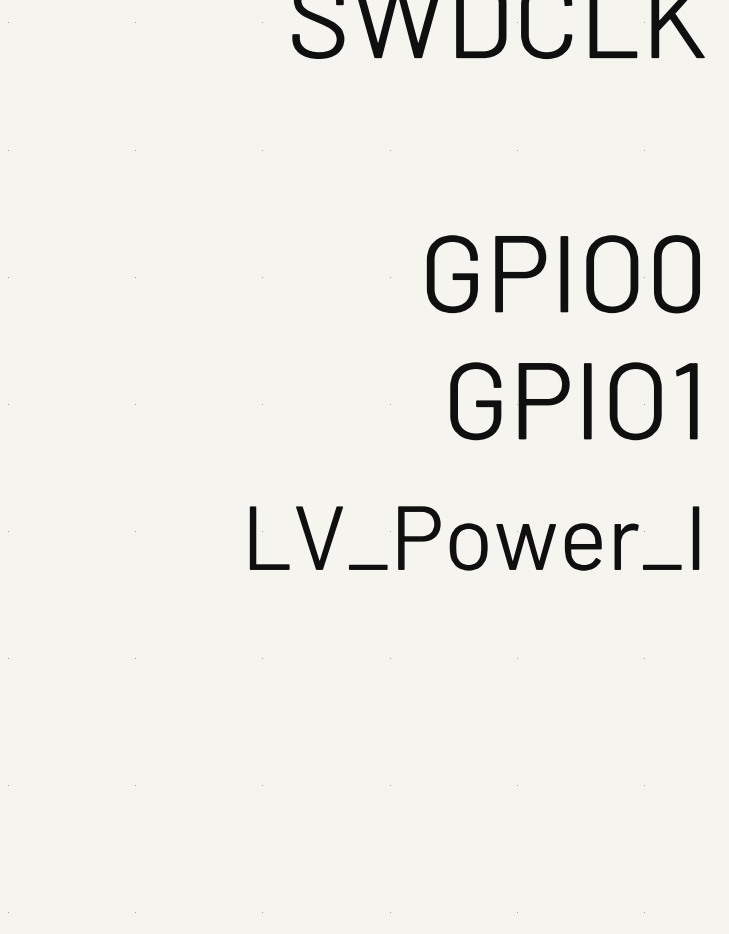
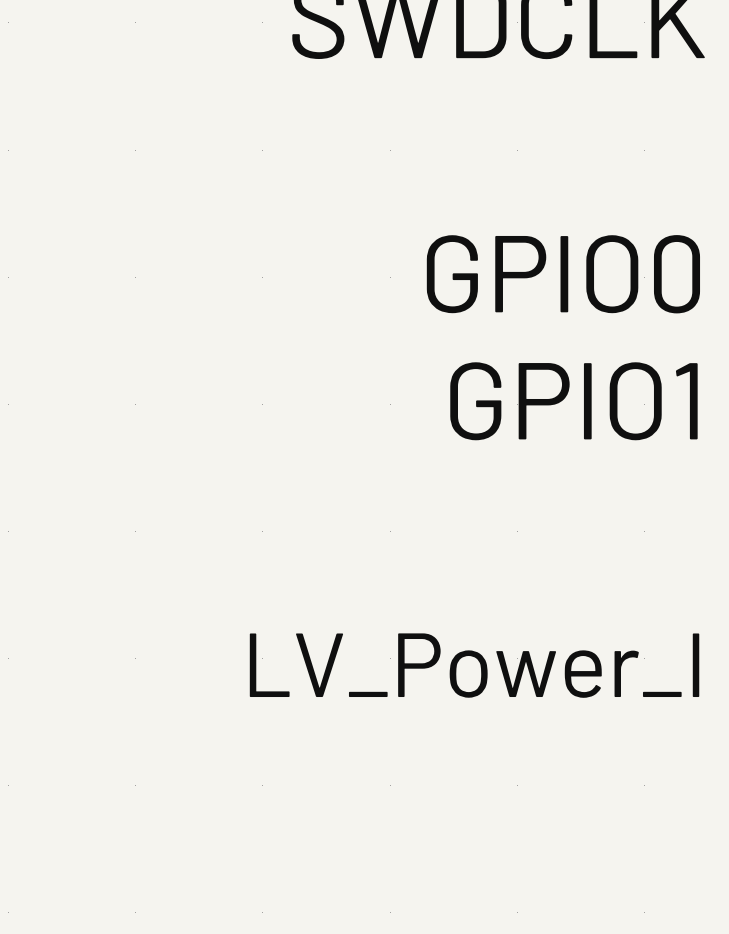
label position: LV_Power_I (474, 538) -> LV_Power_I (474, 665)

